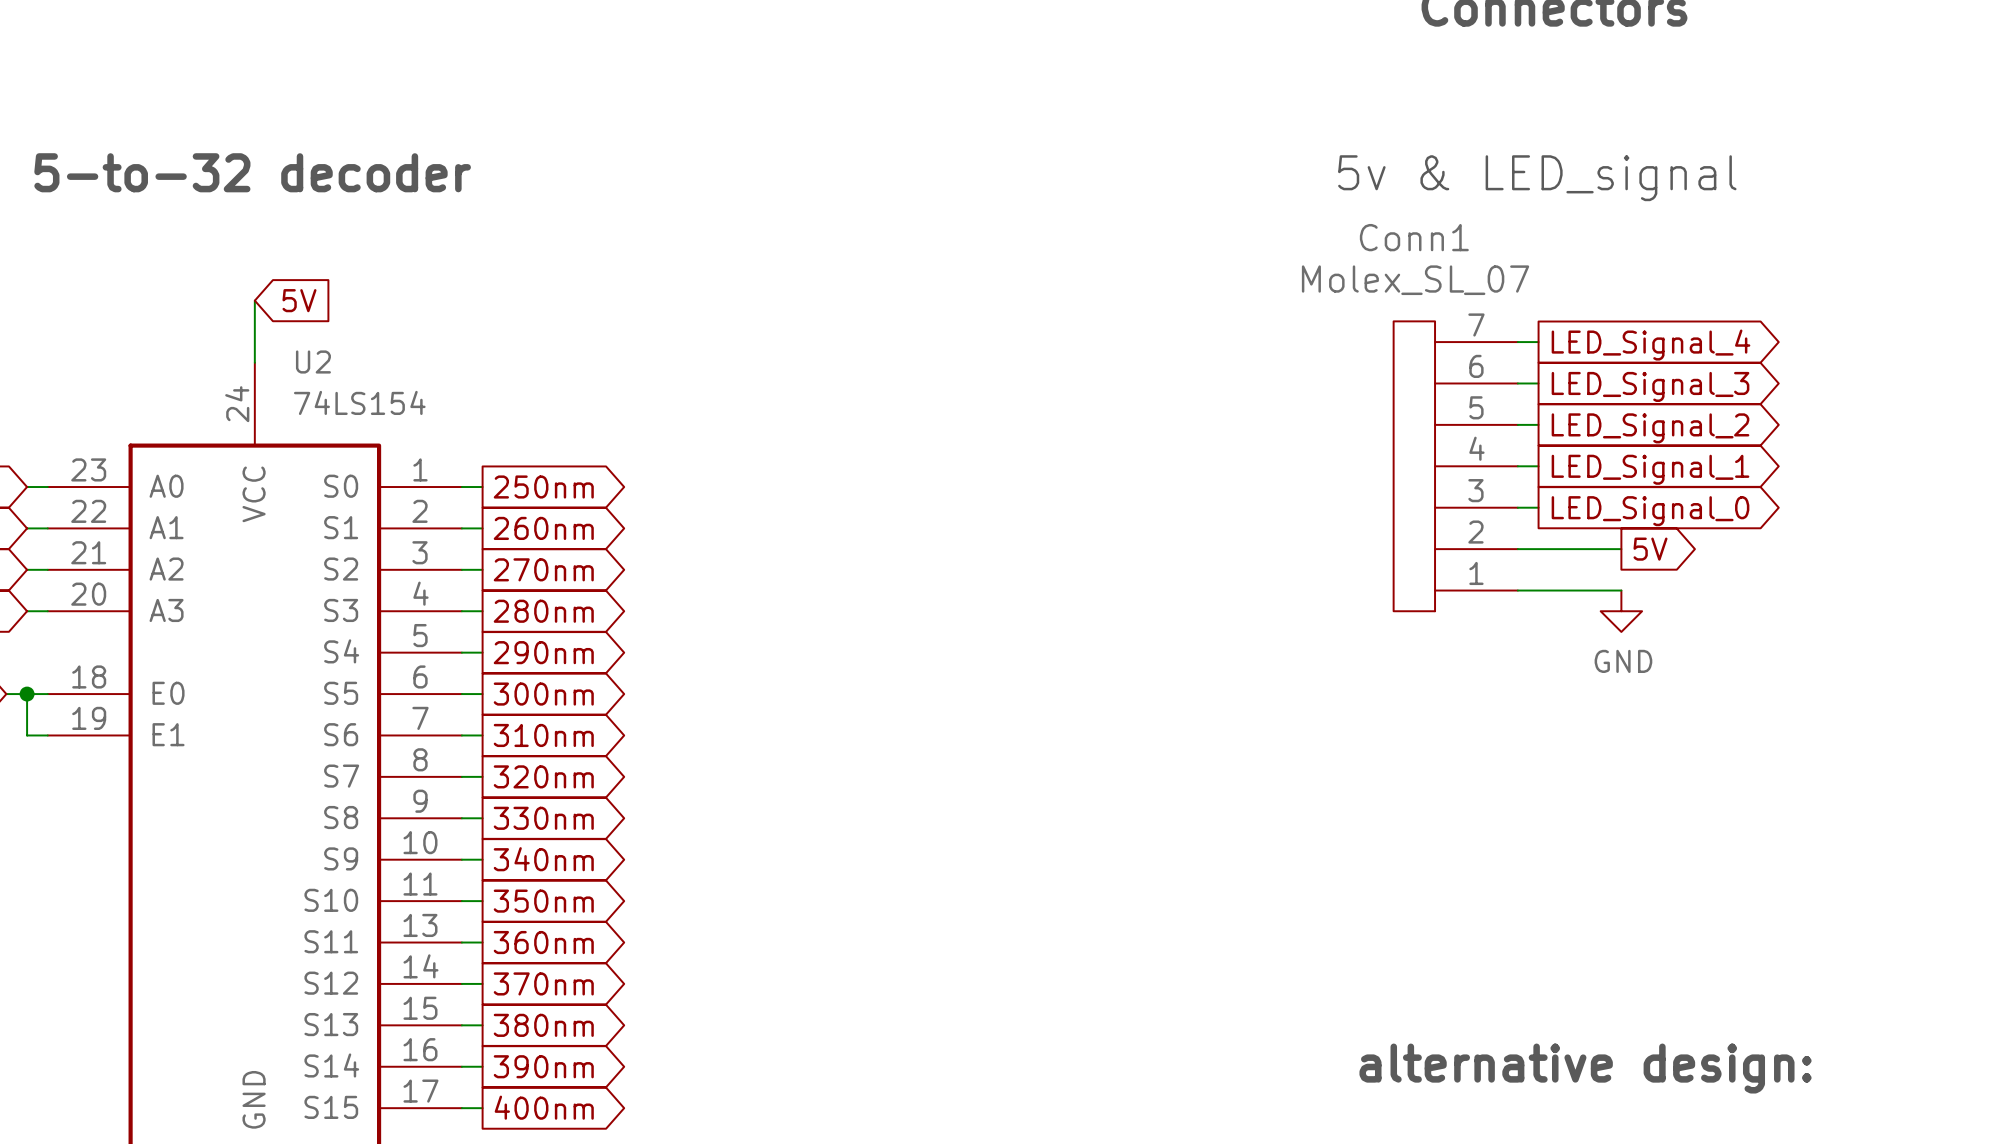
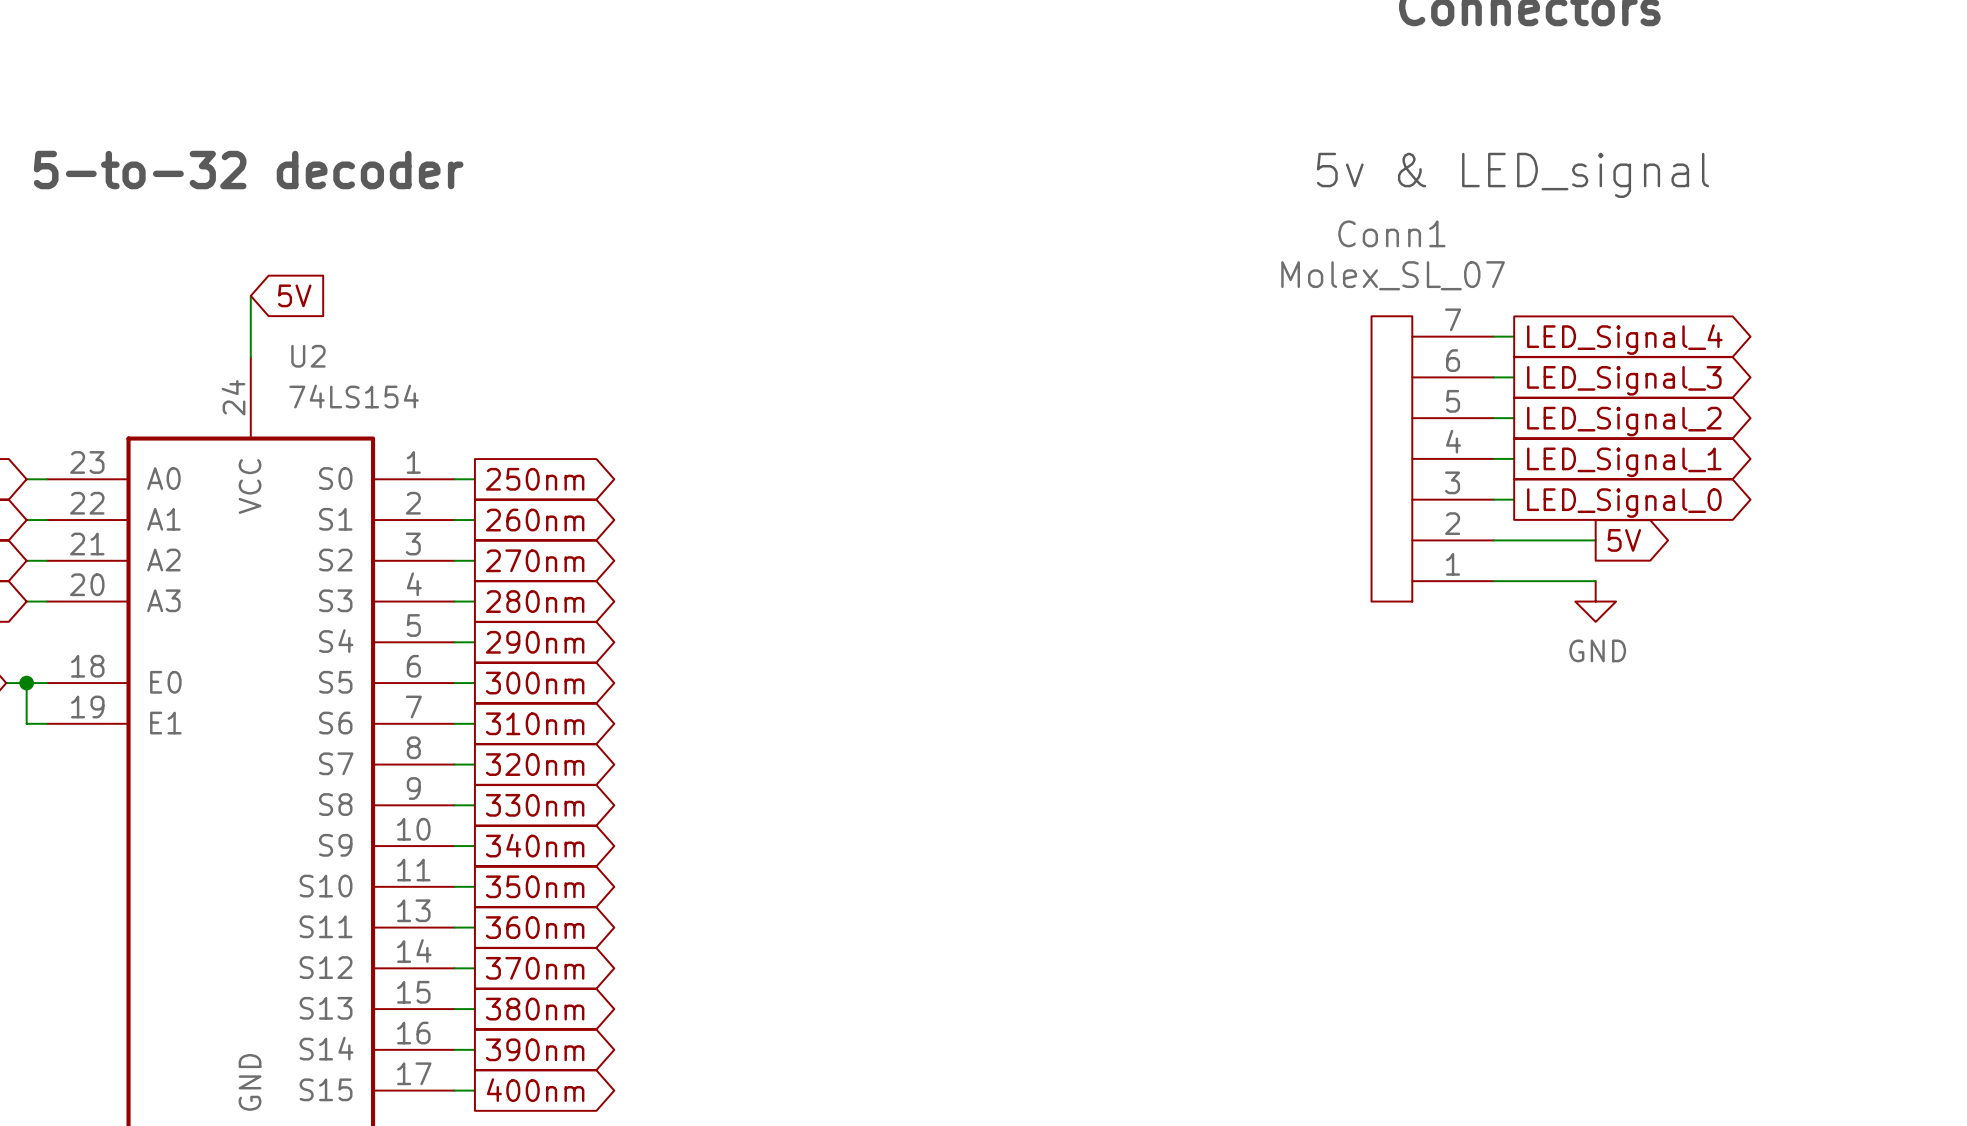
text: alternative design: (1585, 1068) -> none

